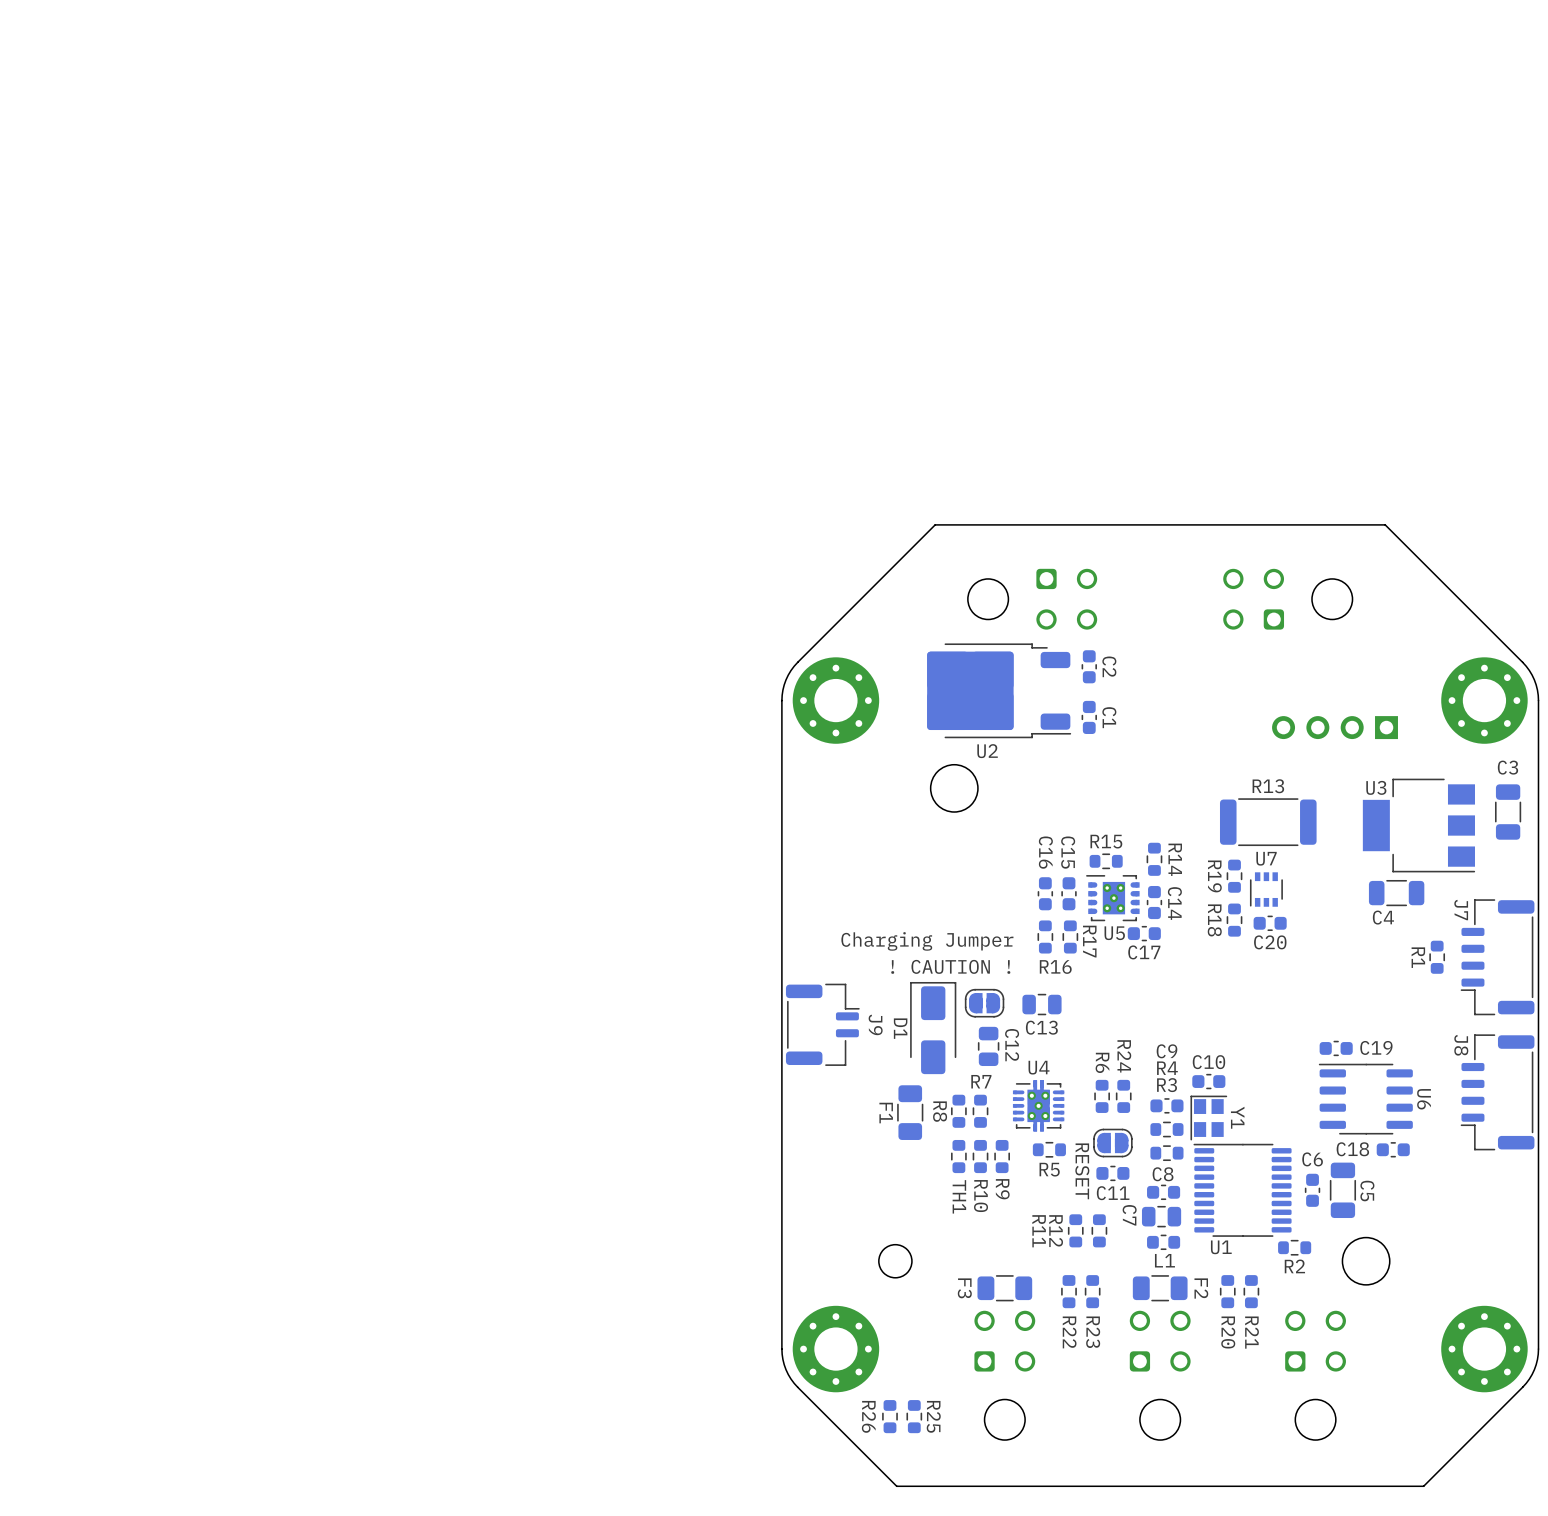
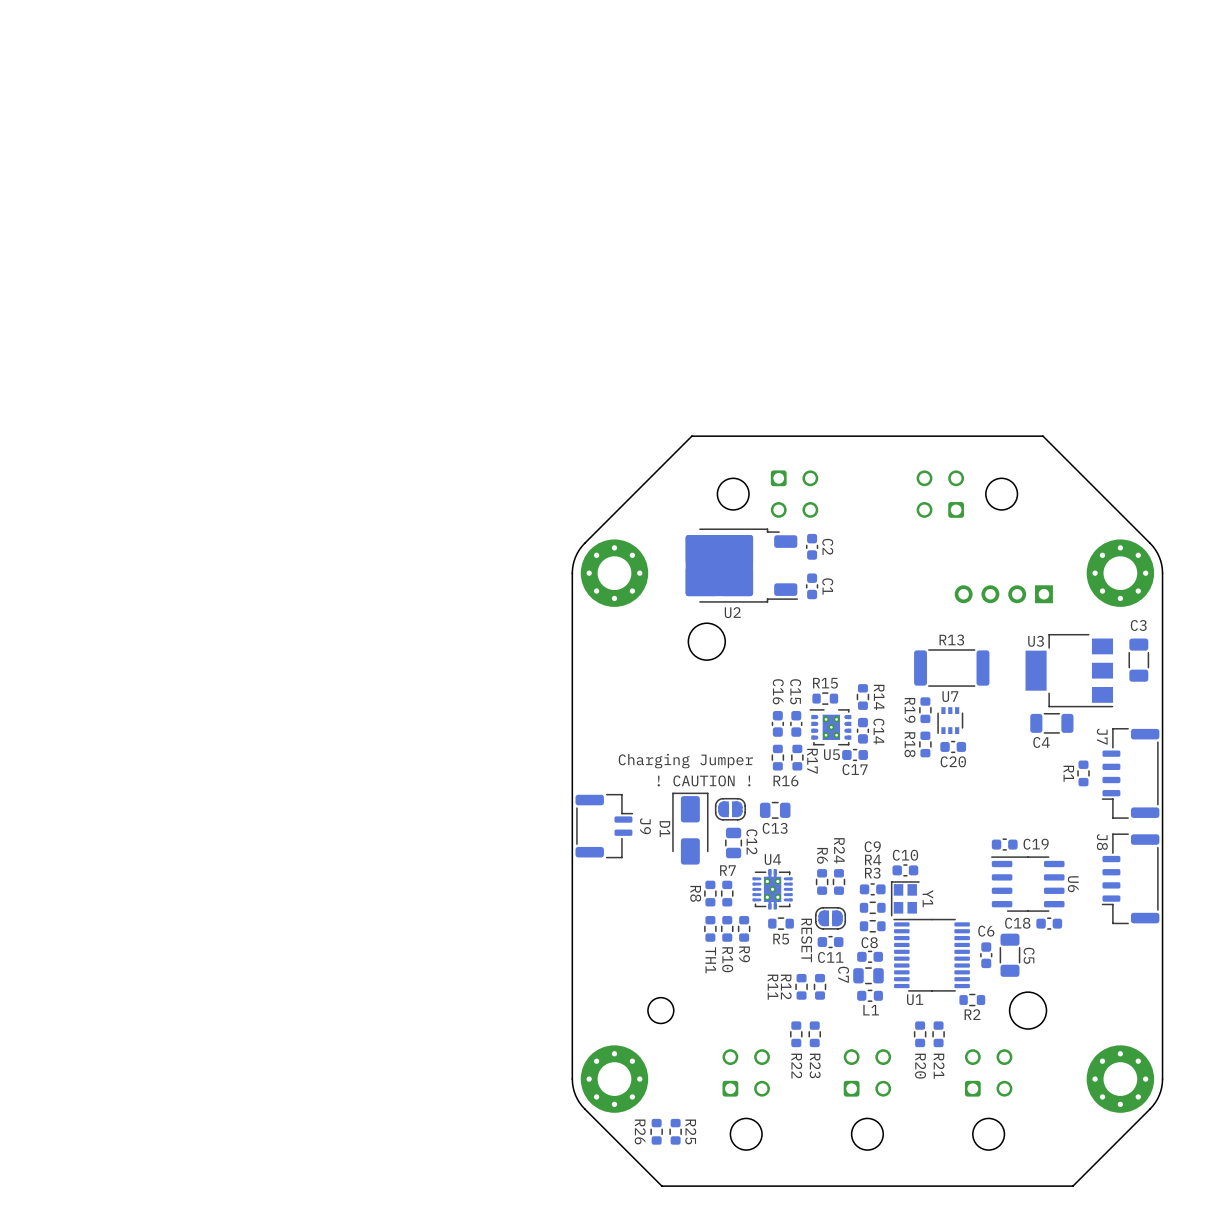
F1: (910, 1112) -> none
F3: (1004, 1288) -> none
F2: (1160, 1288) -> none

